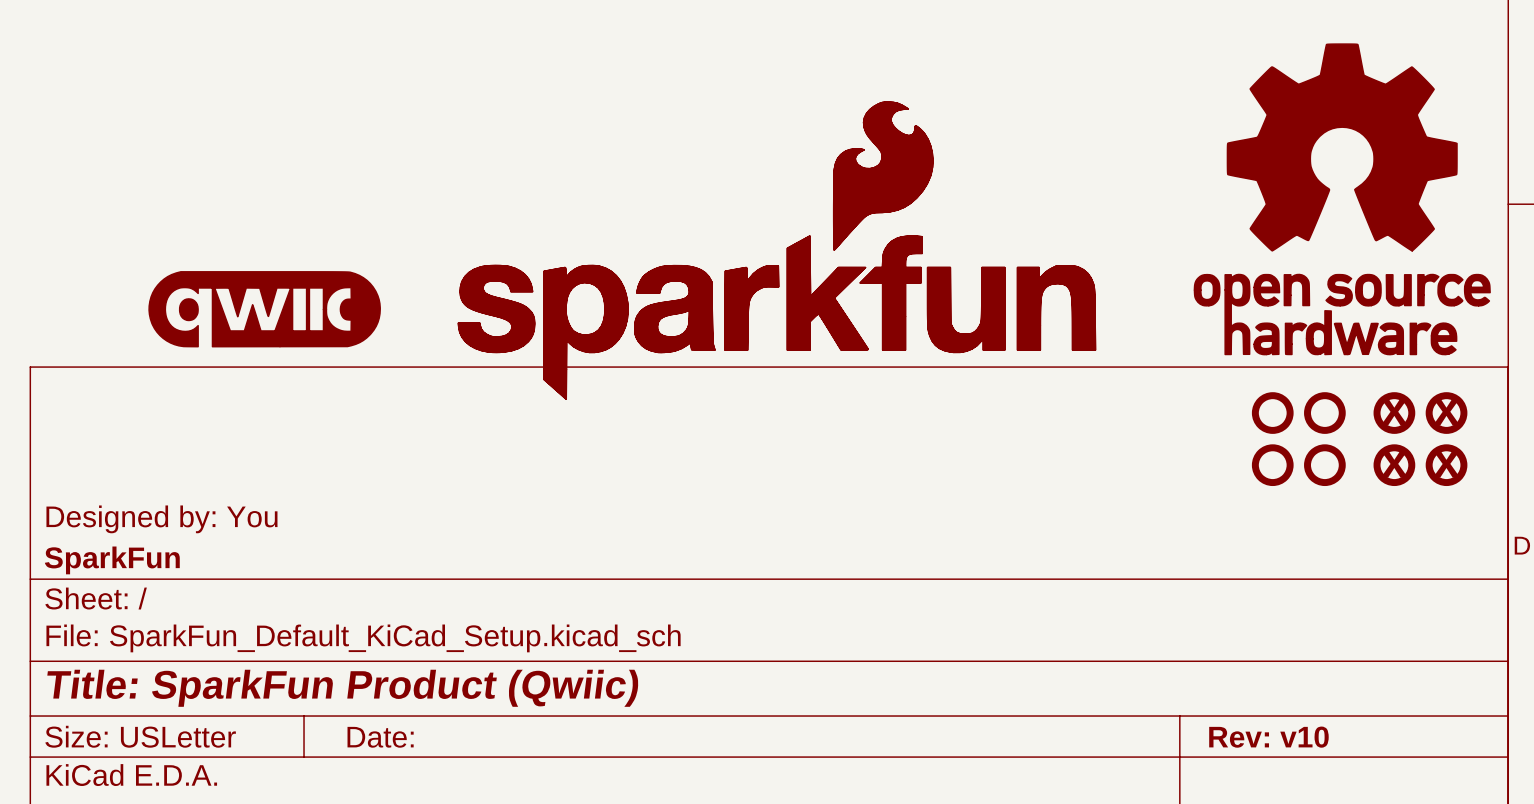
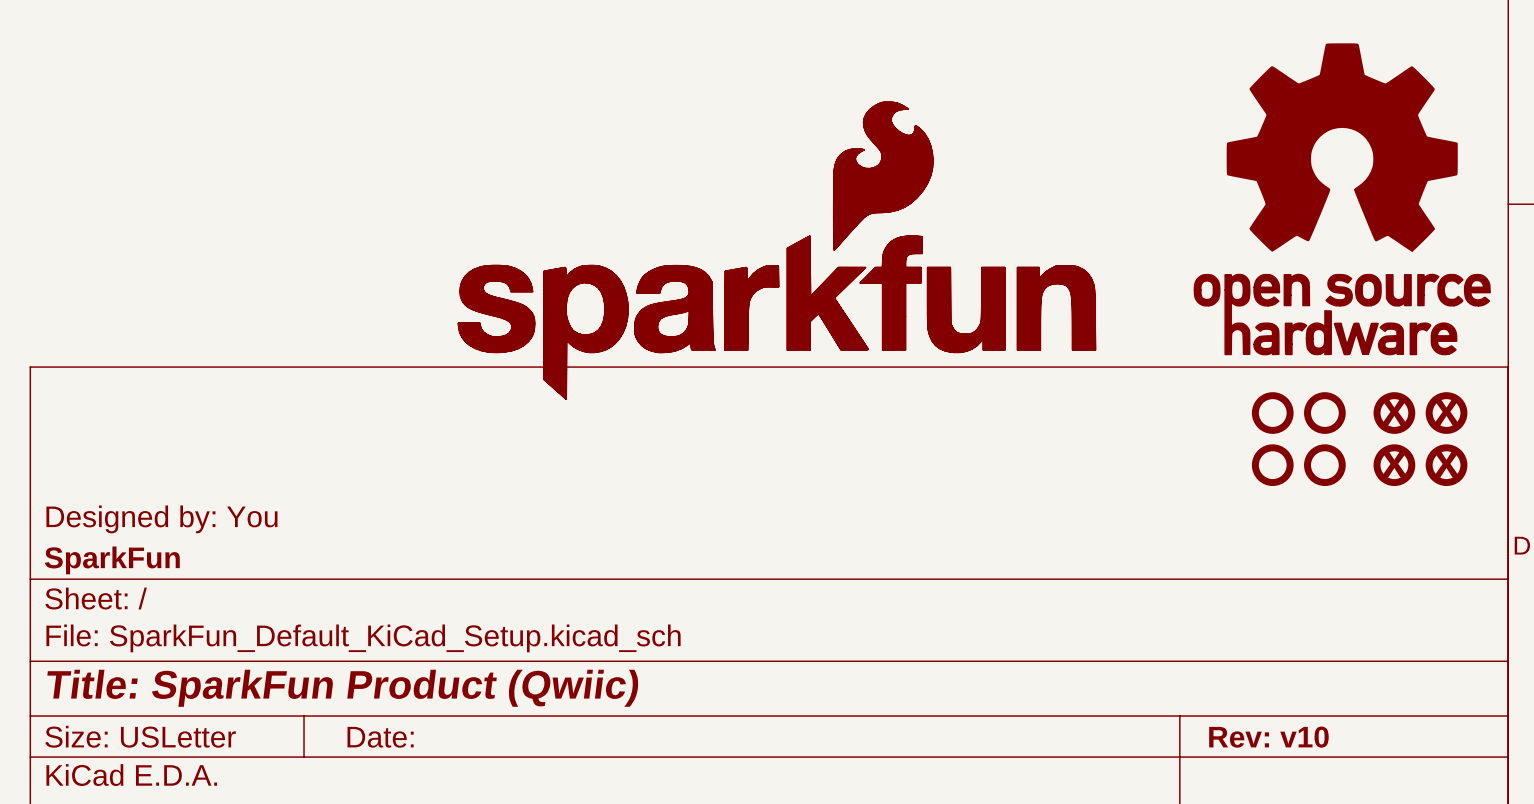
part: (264, 309) -> none

